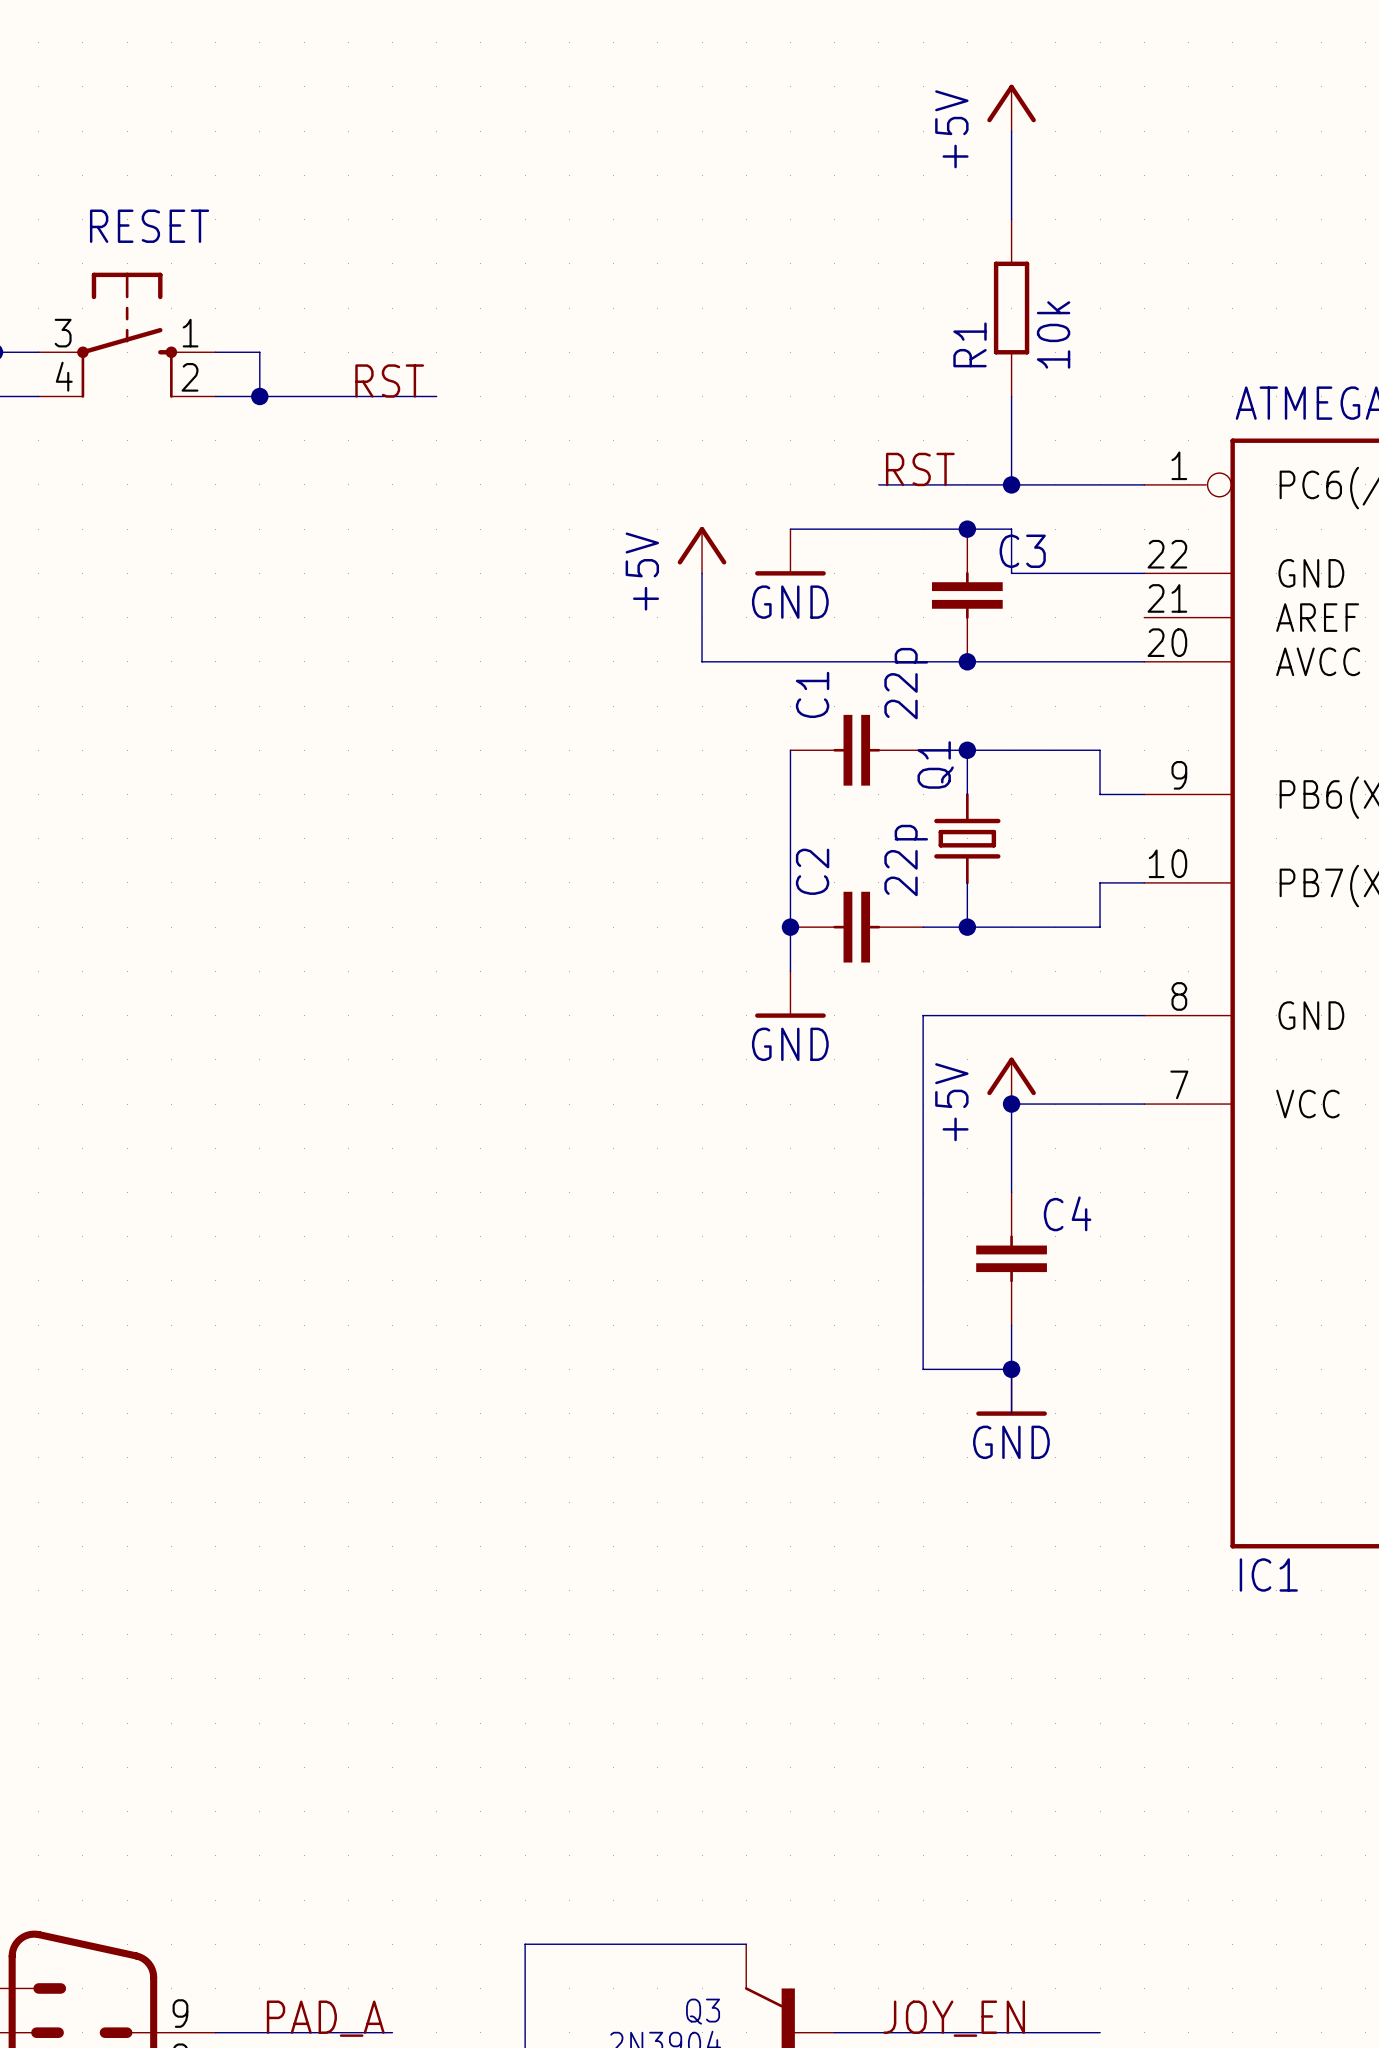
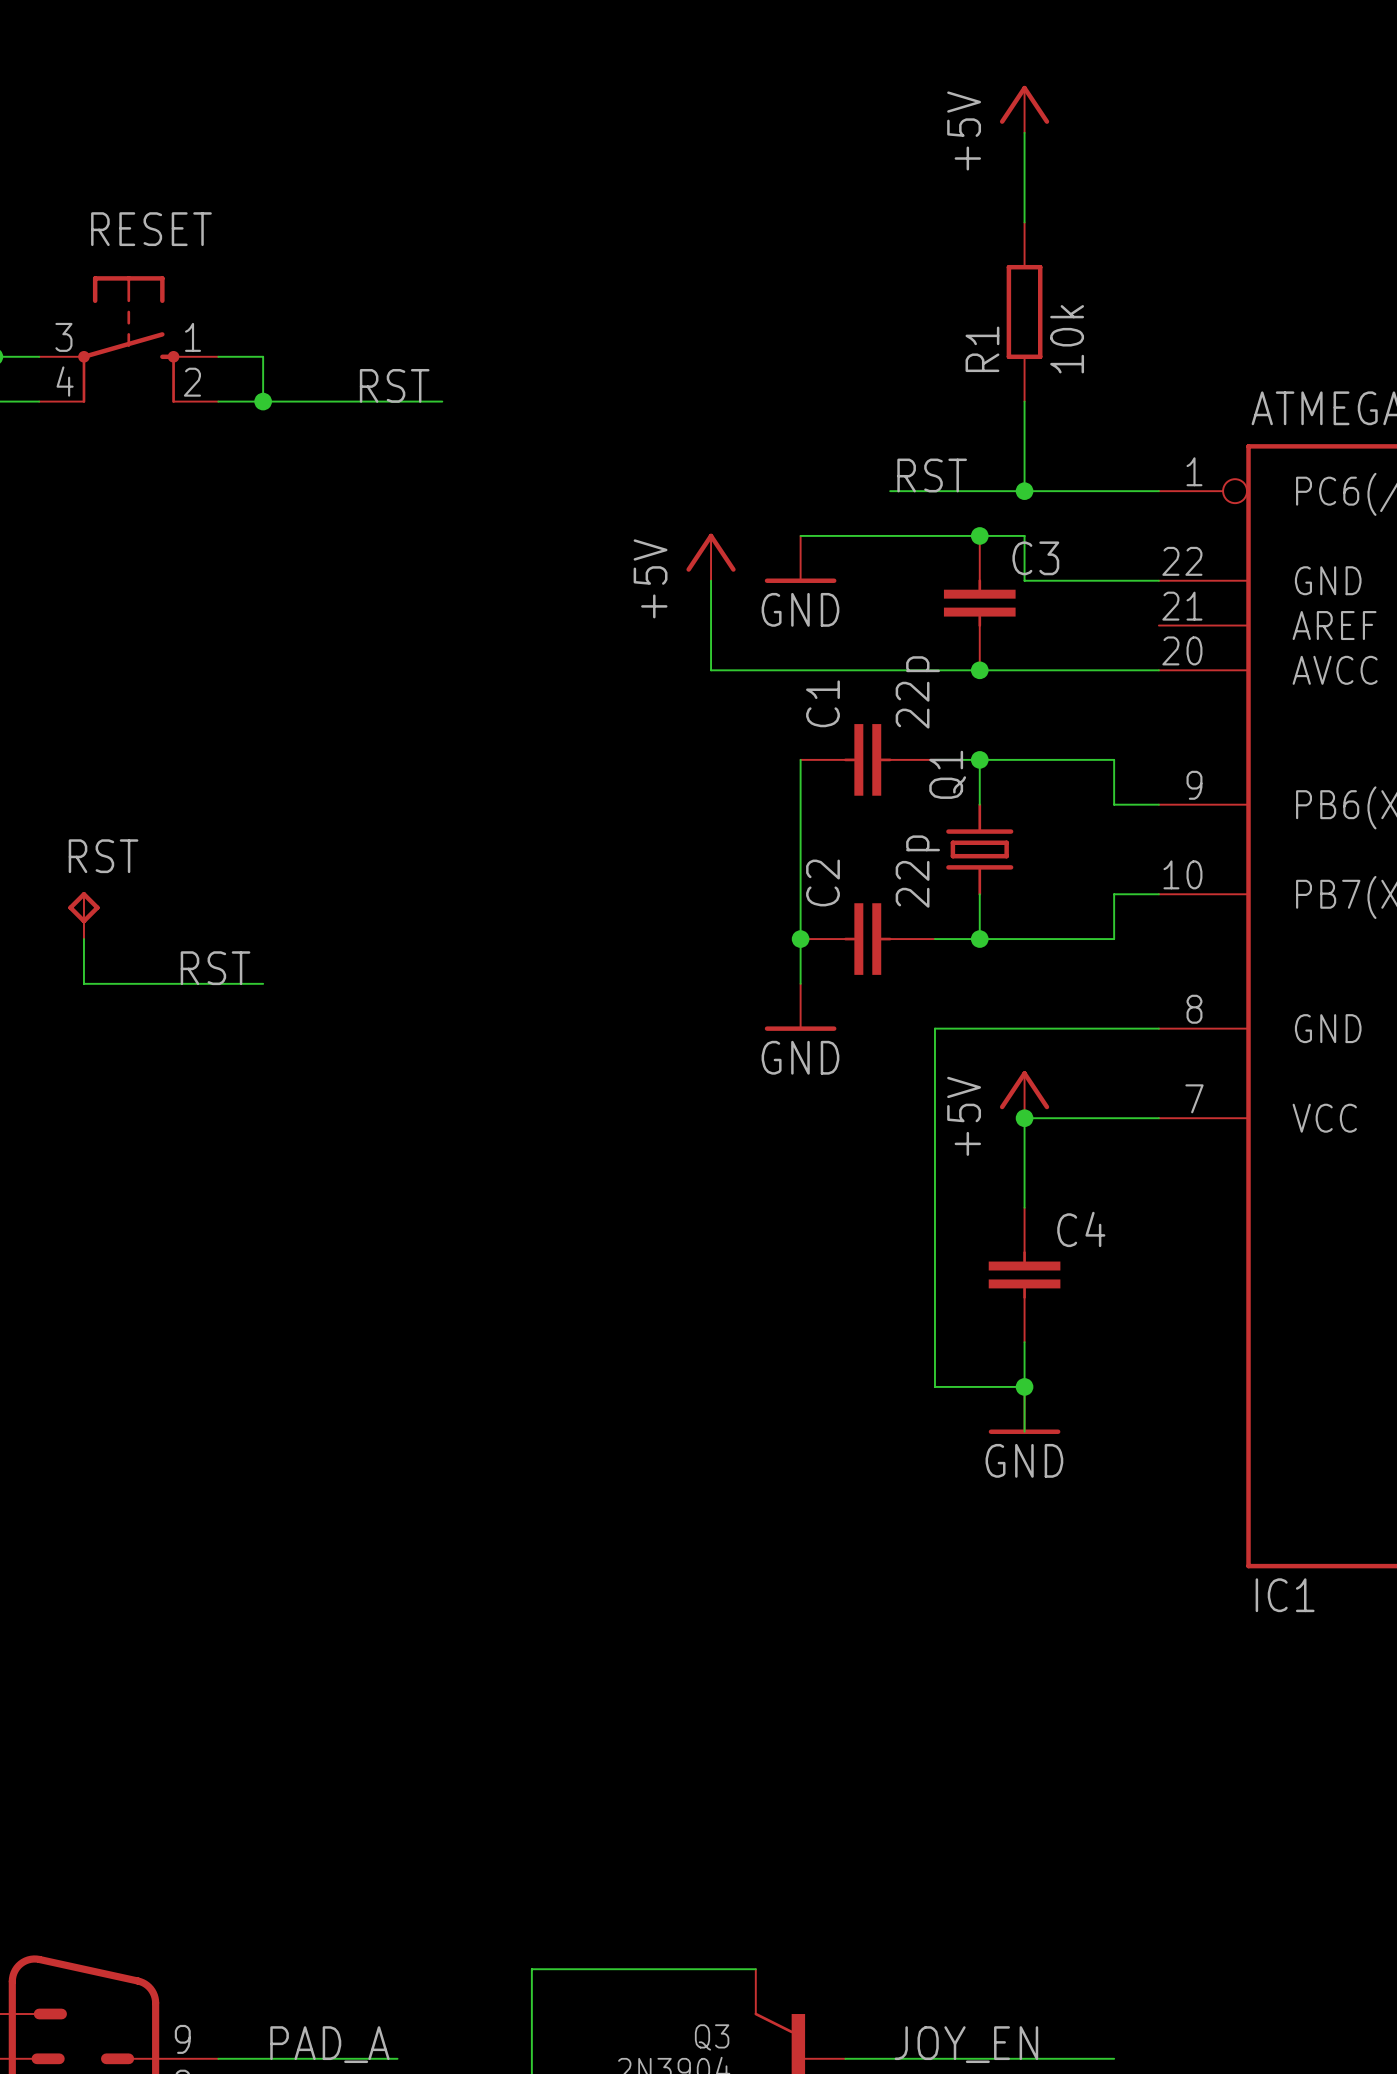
RST: none -> (83, 915)
wire: none -> (83, 939) (83, 983) (263, 983)
label: none -> RST (215, 968)

